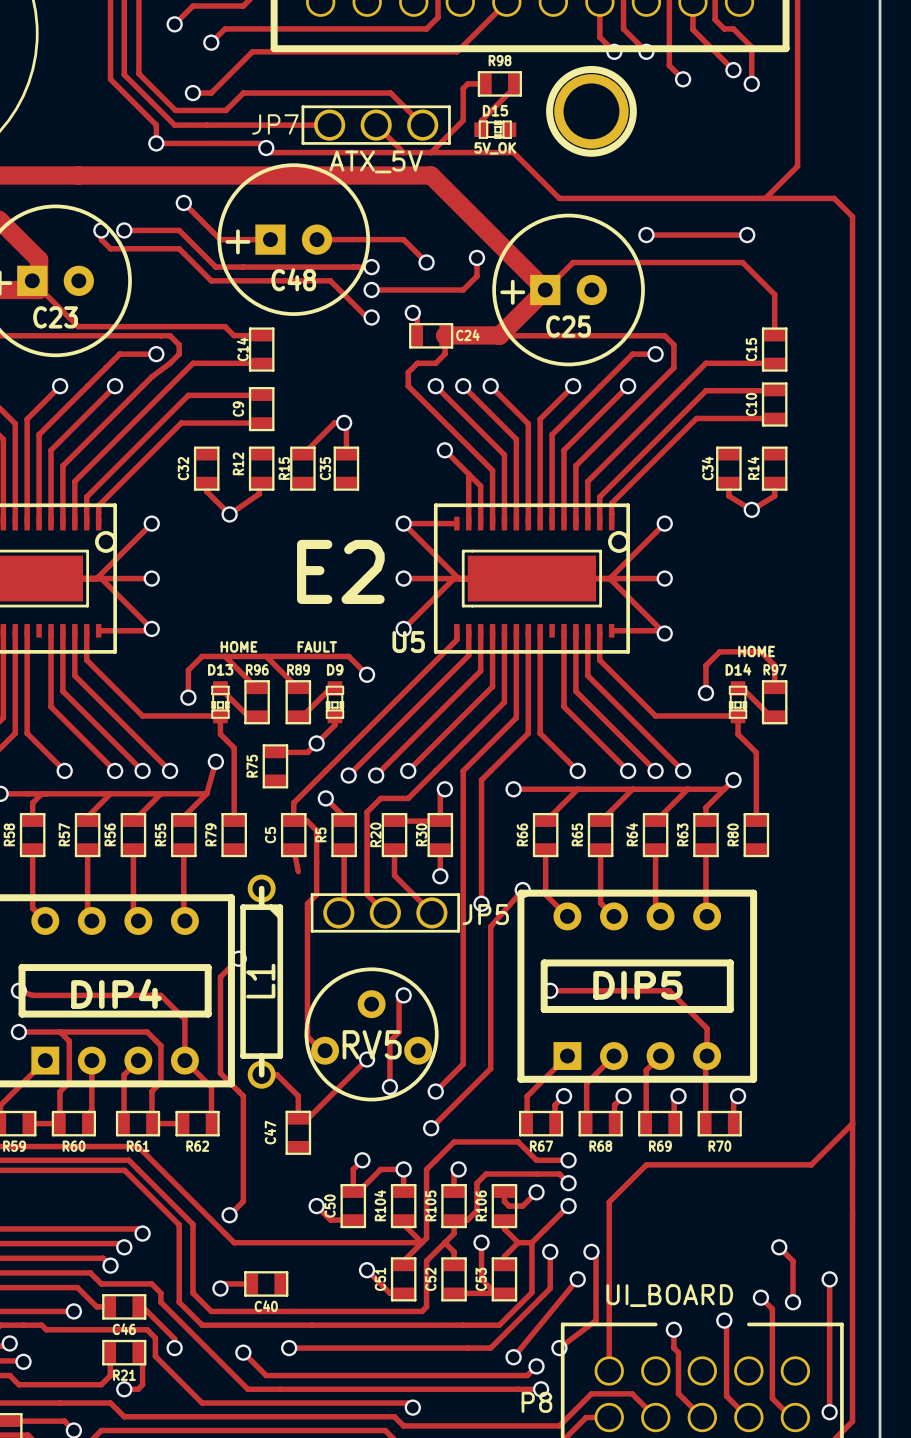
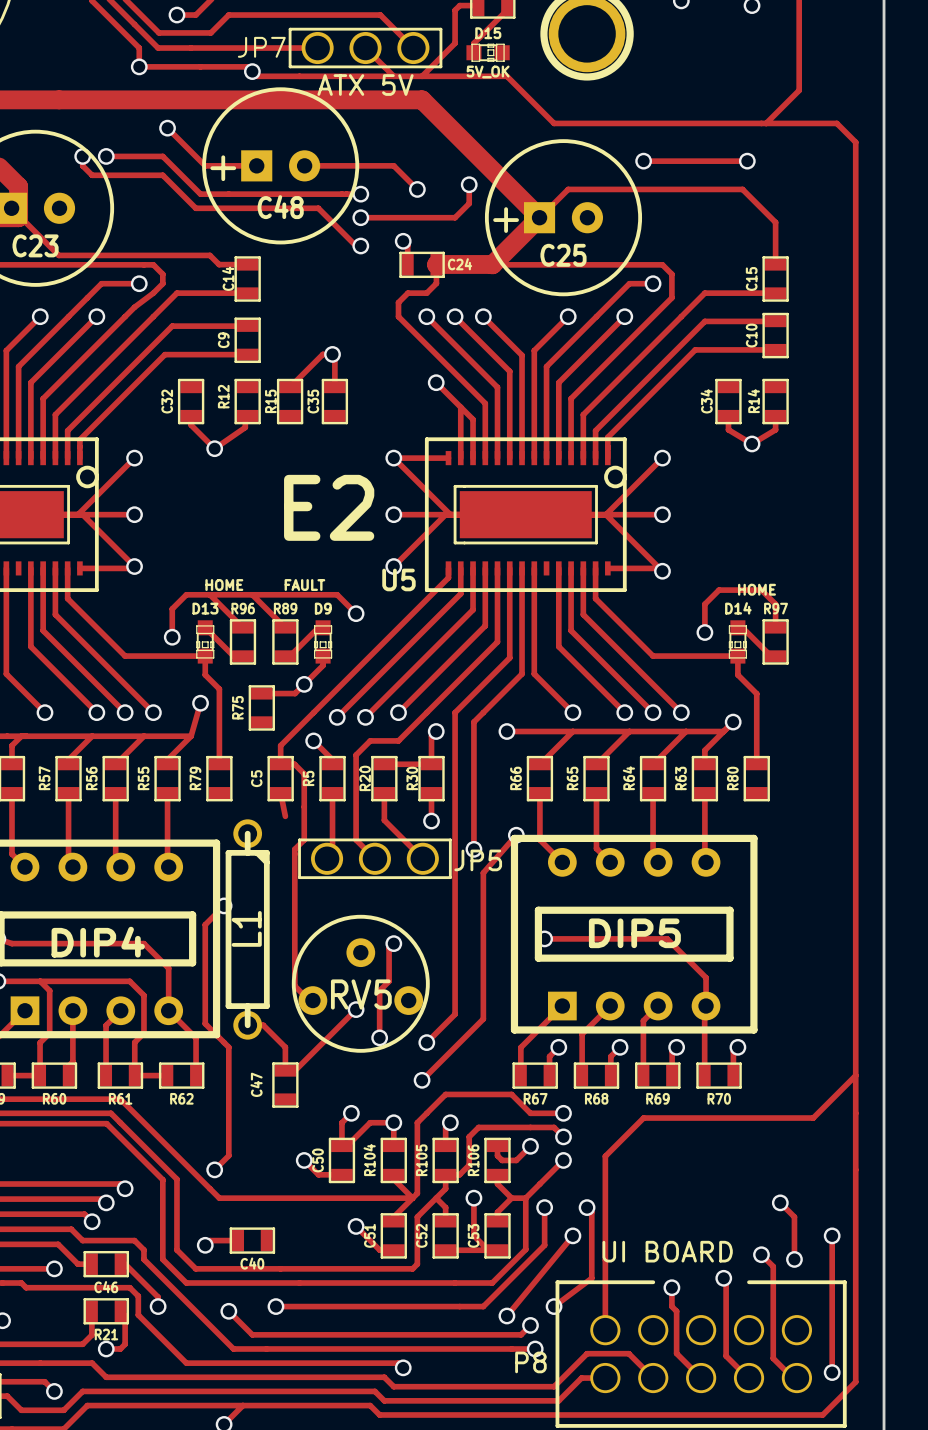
JP7 value: ATX_5V (376, 161) -> ATX 5V (365, 85)
P8 value: UI_BOARD (669, 1295) -> UI BOARD (667, 1251)

